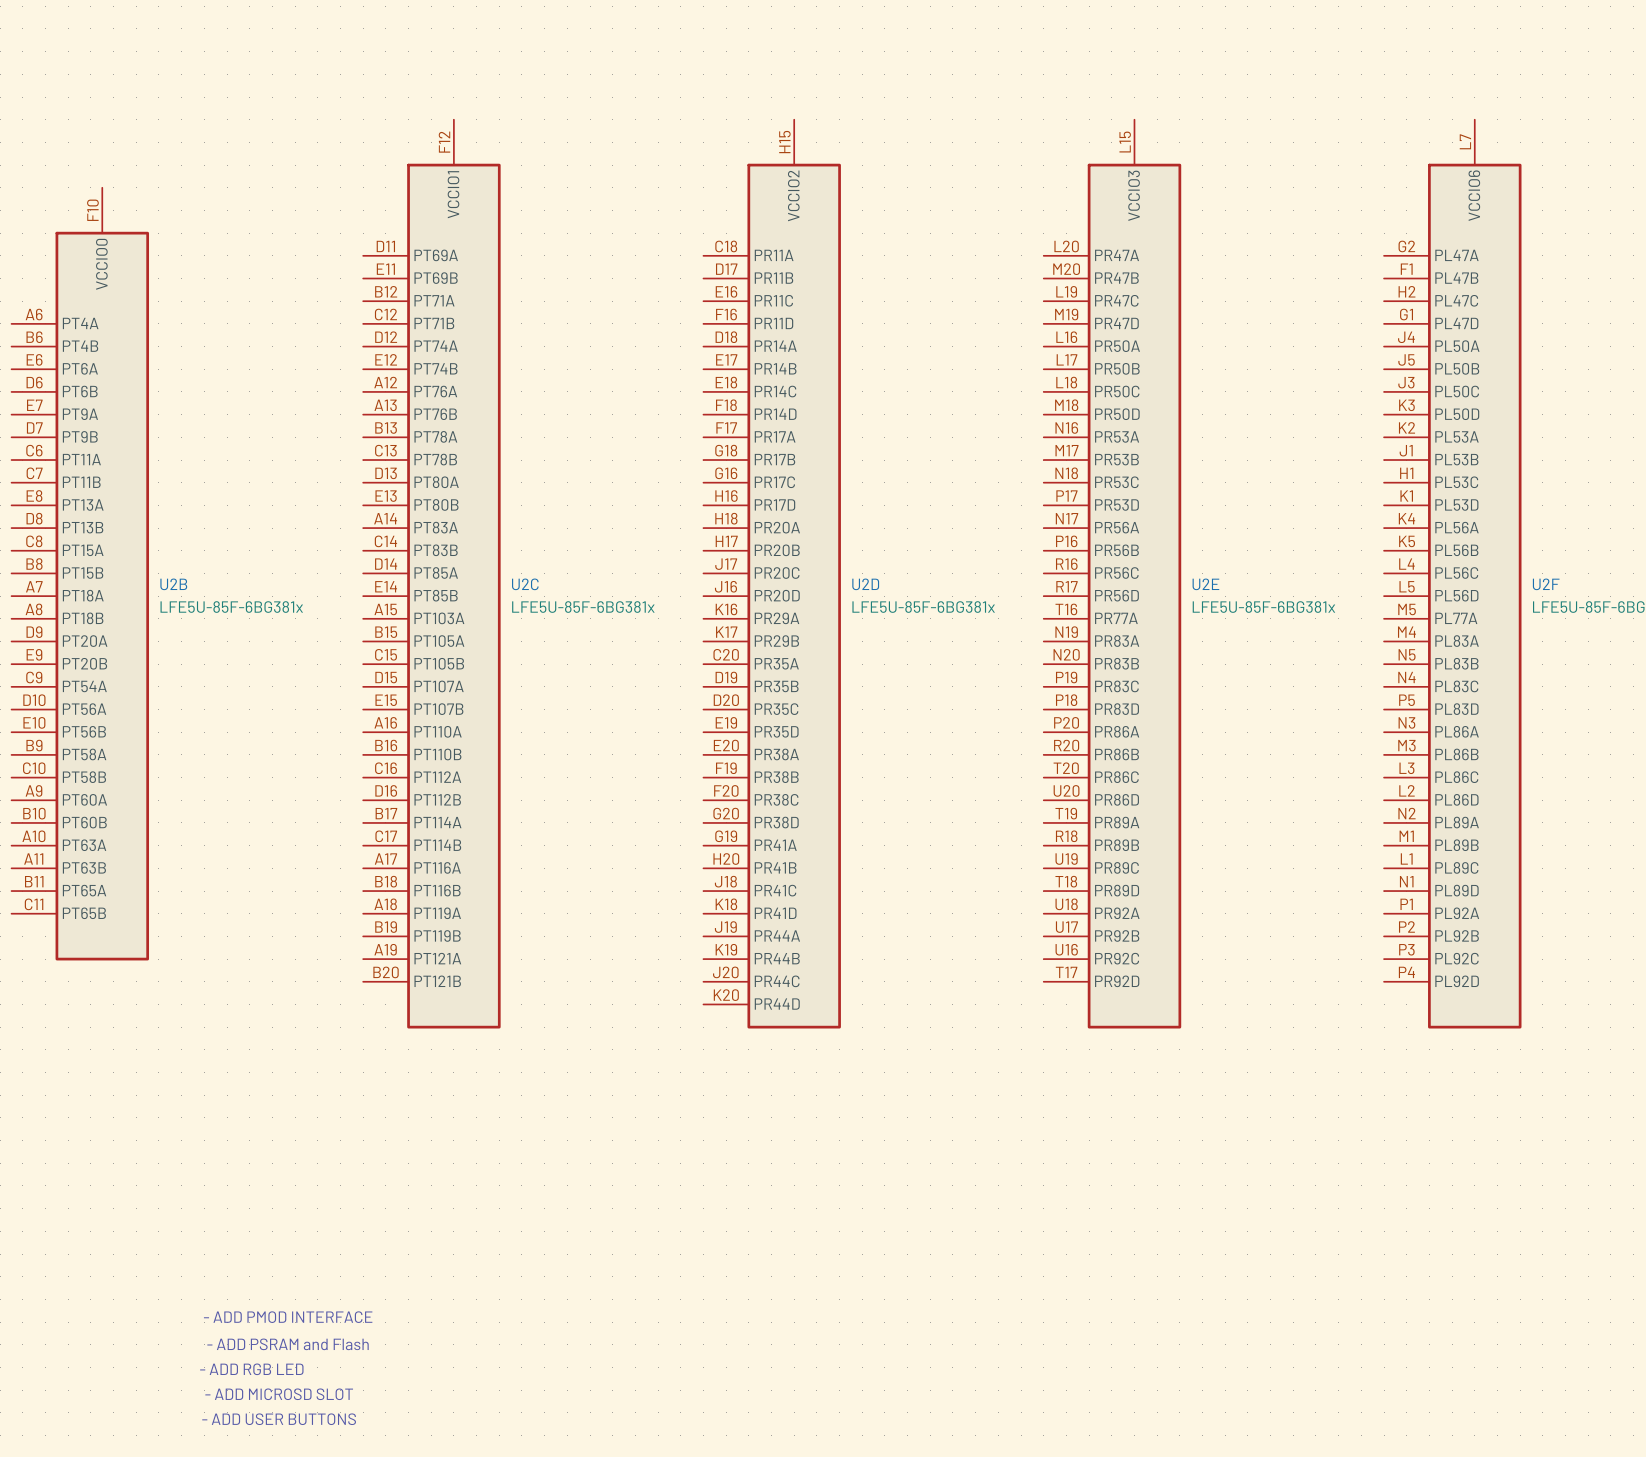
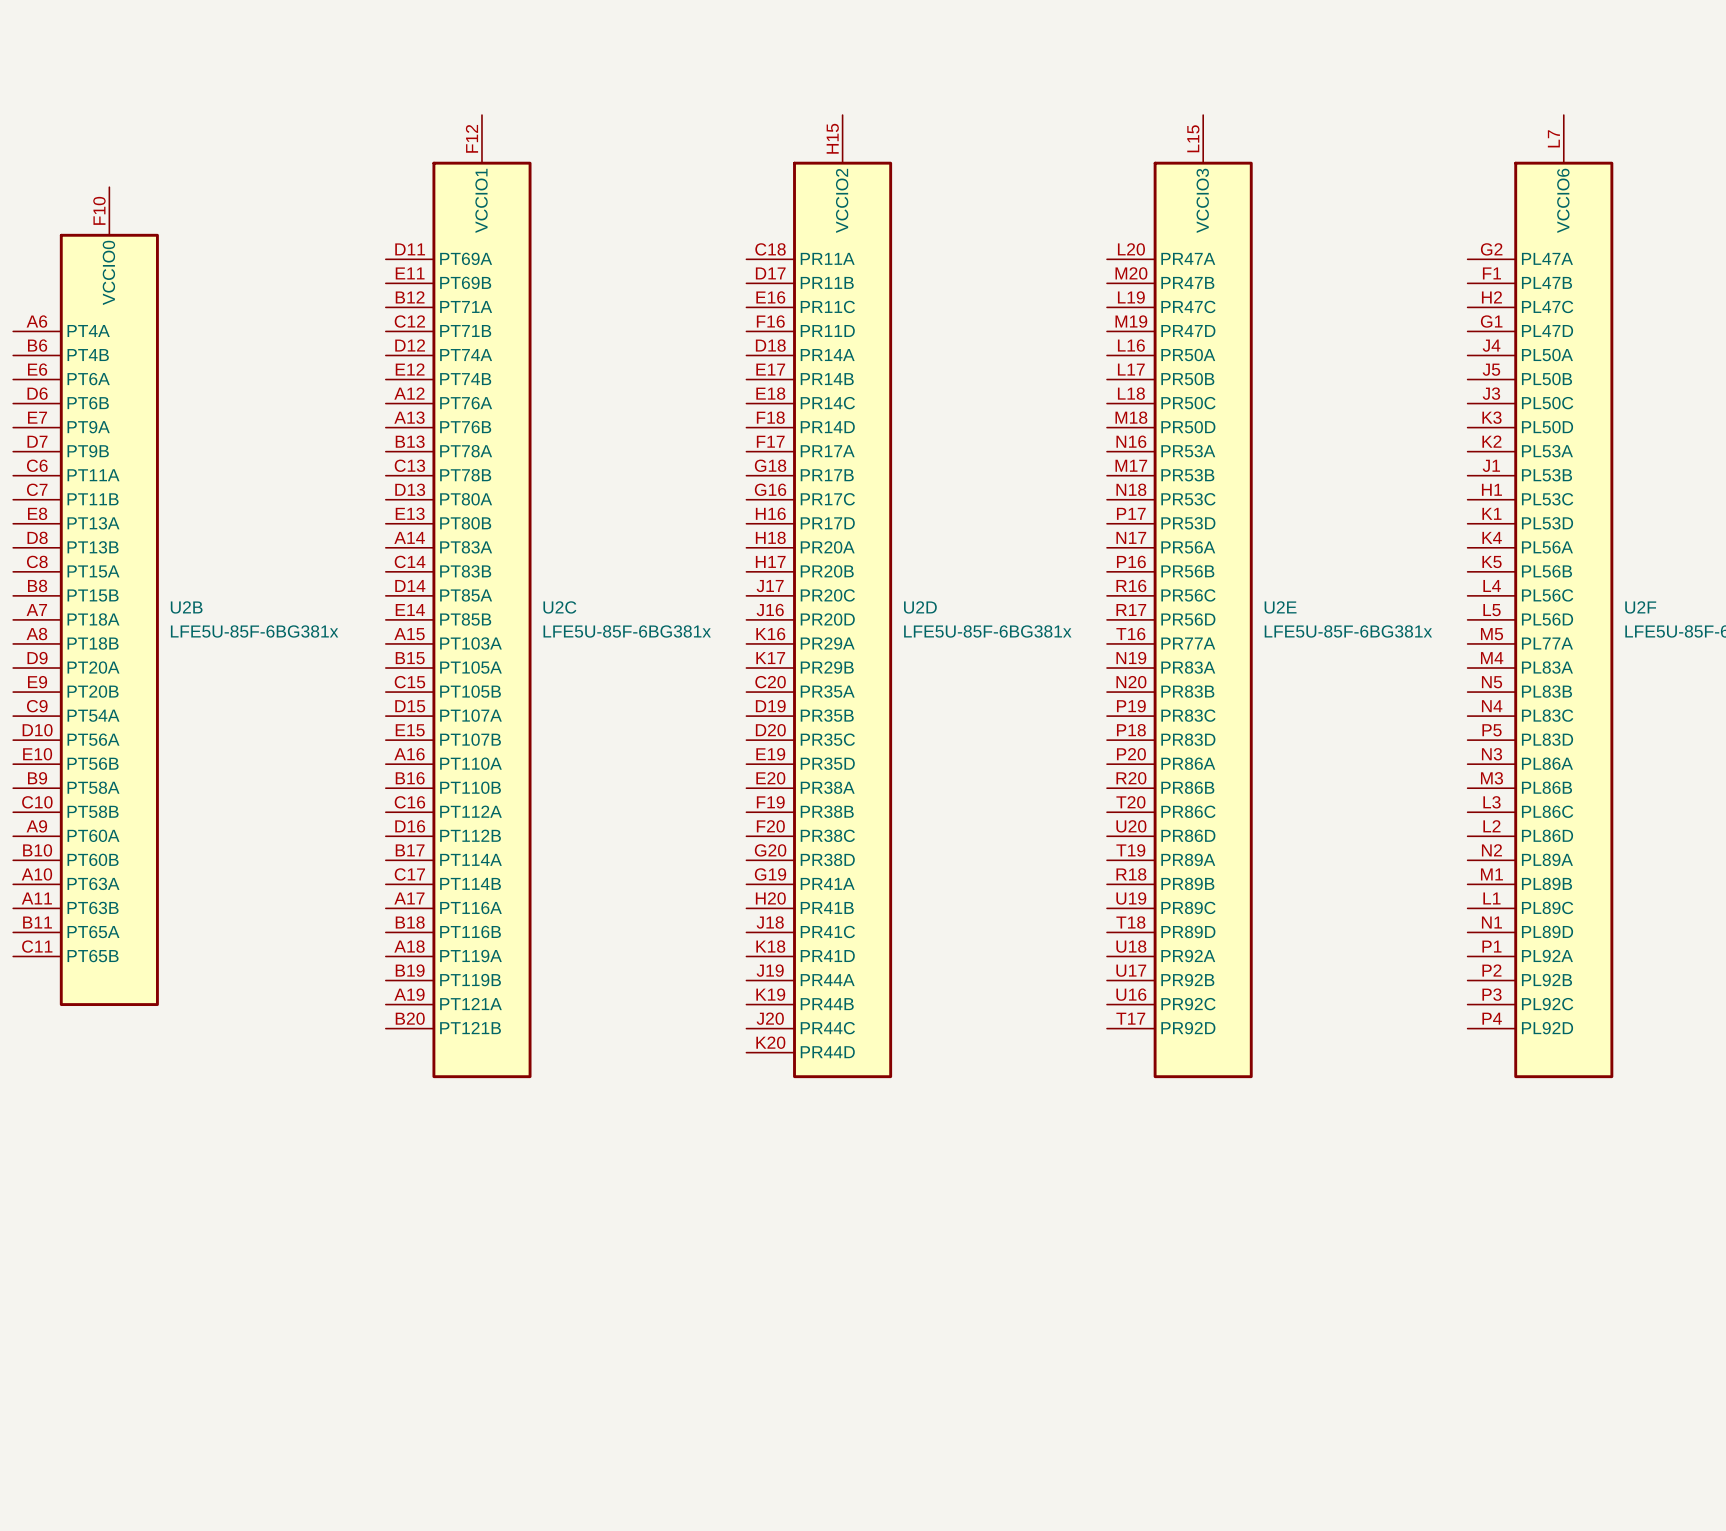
text: - ADD PMOD INTERFACE (288, 1317) -> none
text: - ADD PSRAM and Flash (288, 1344) -> none
text: - ADD RGB LED (251, 1369) -> none
text: - ADD MICROSD SLOT (279, 1394) -> none
text: - ADD USER BUTTONS (279, 1419) -> none

